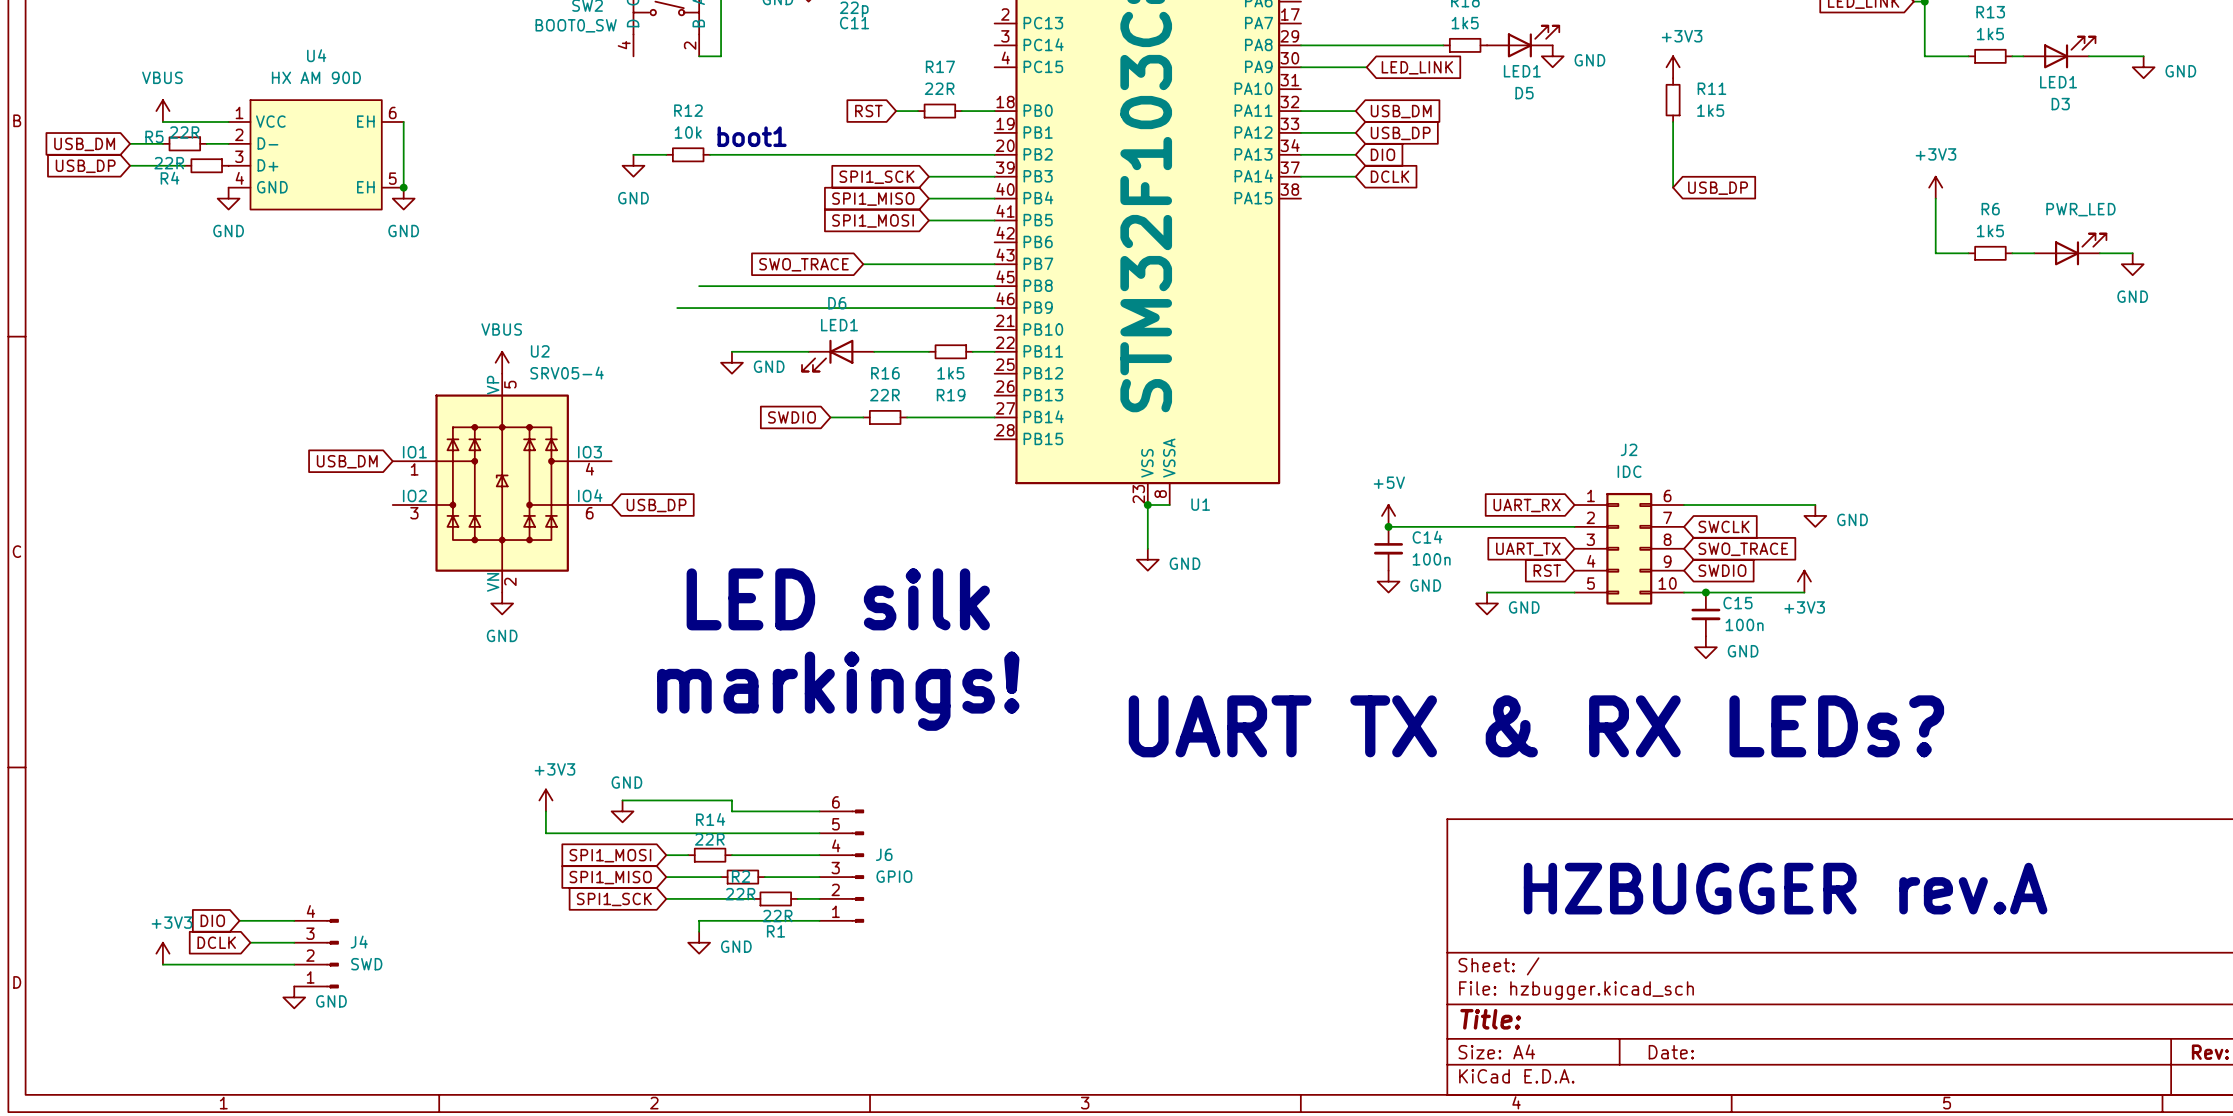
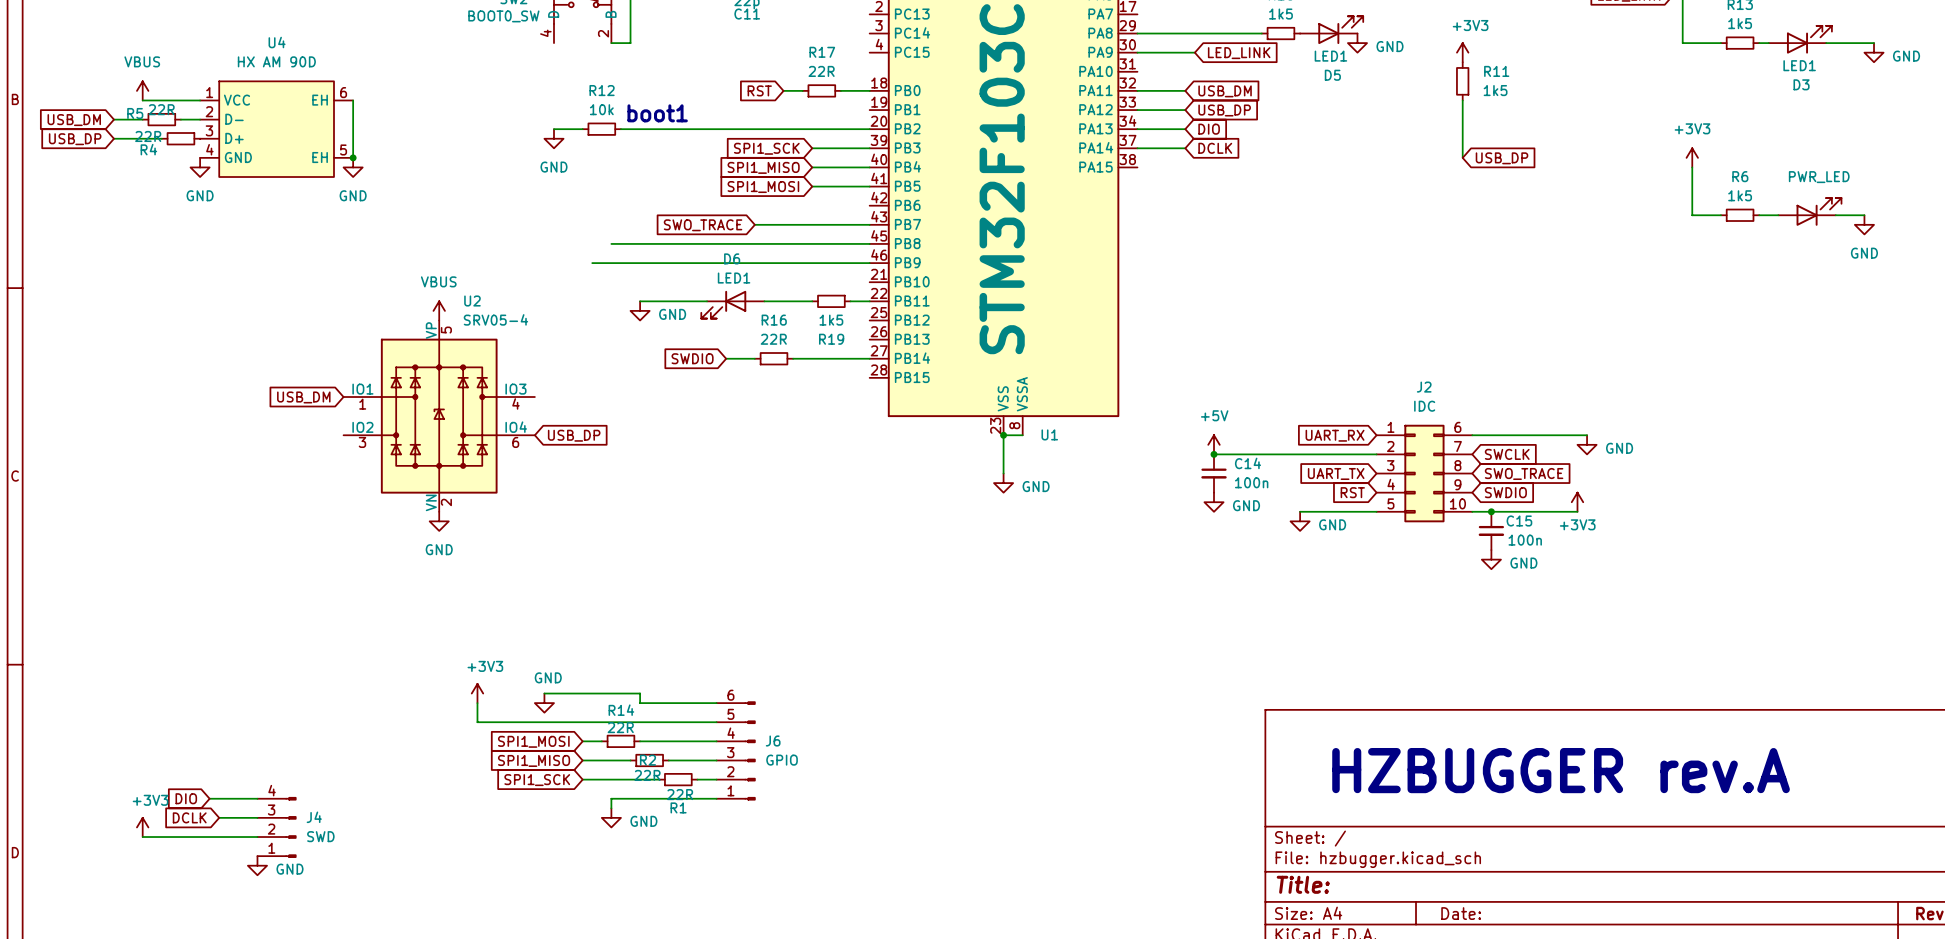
text: LED silk (838, 599) -> none
text: markings! (838, 691) -> none
text: UART TX & RX LEDs? (1536, 726) -> none

